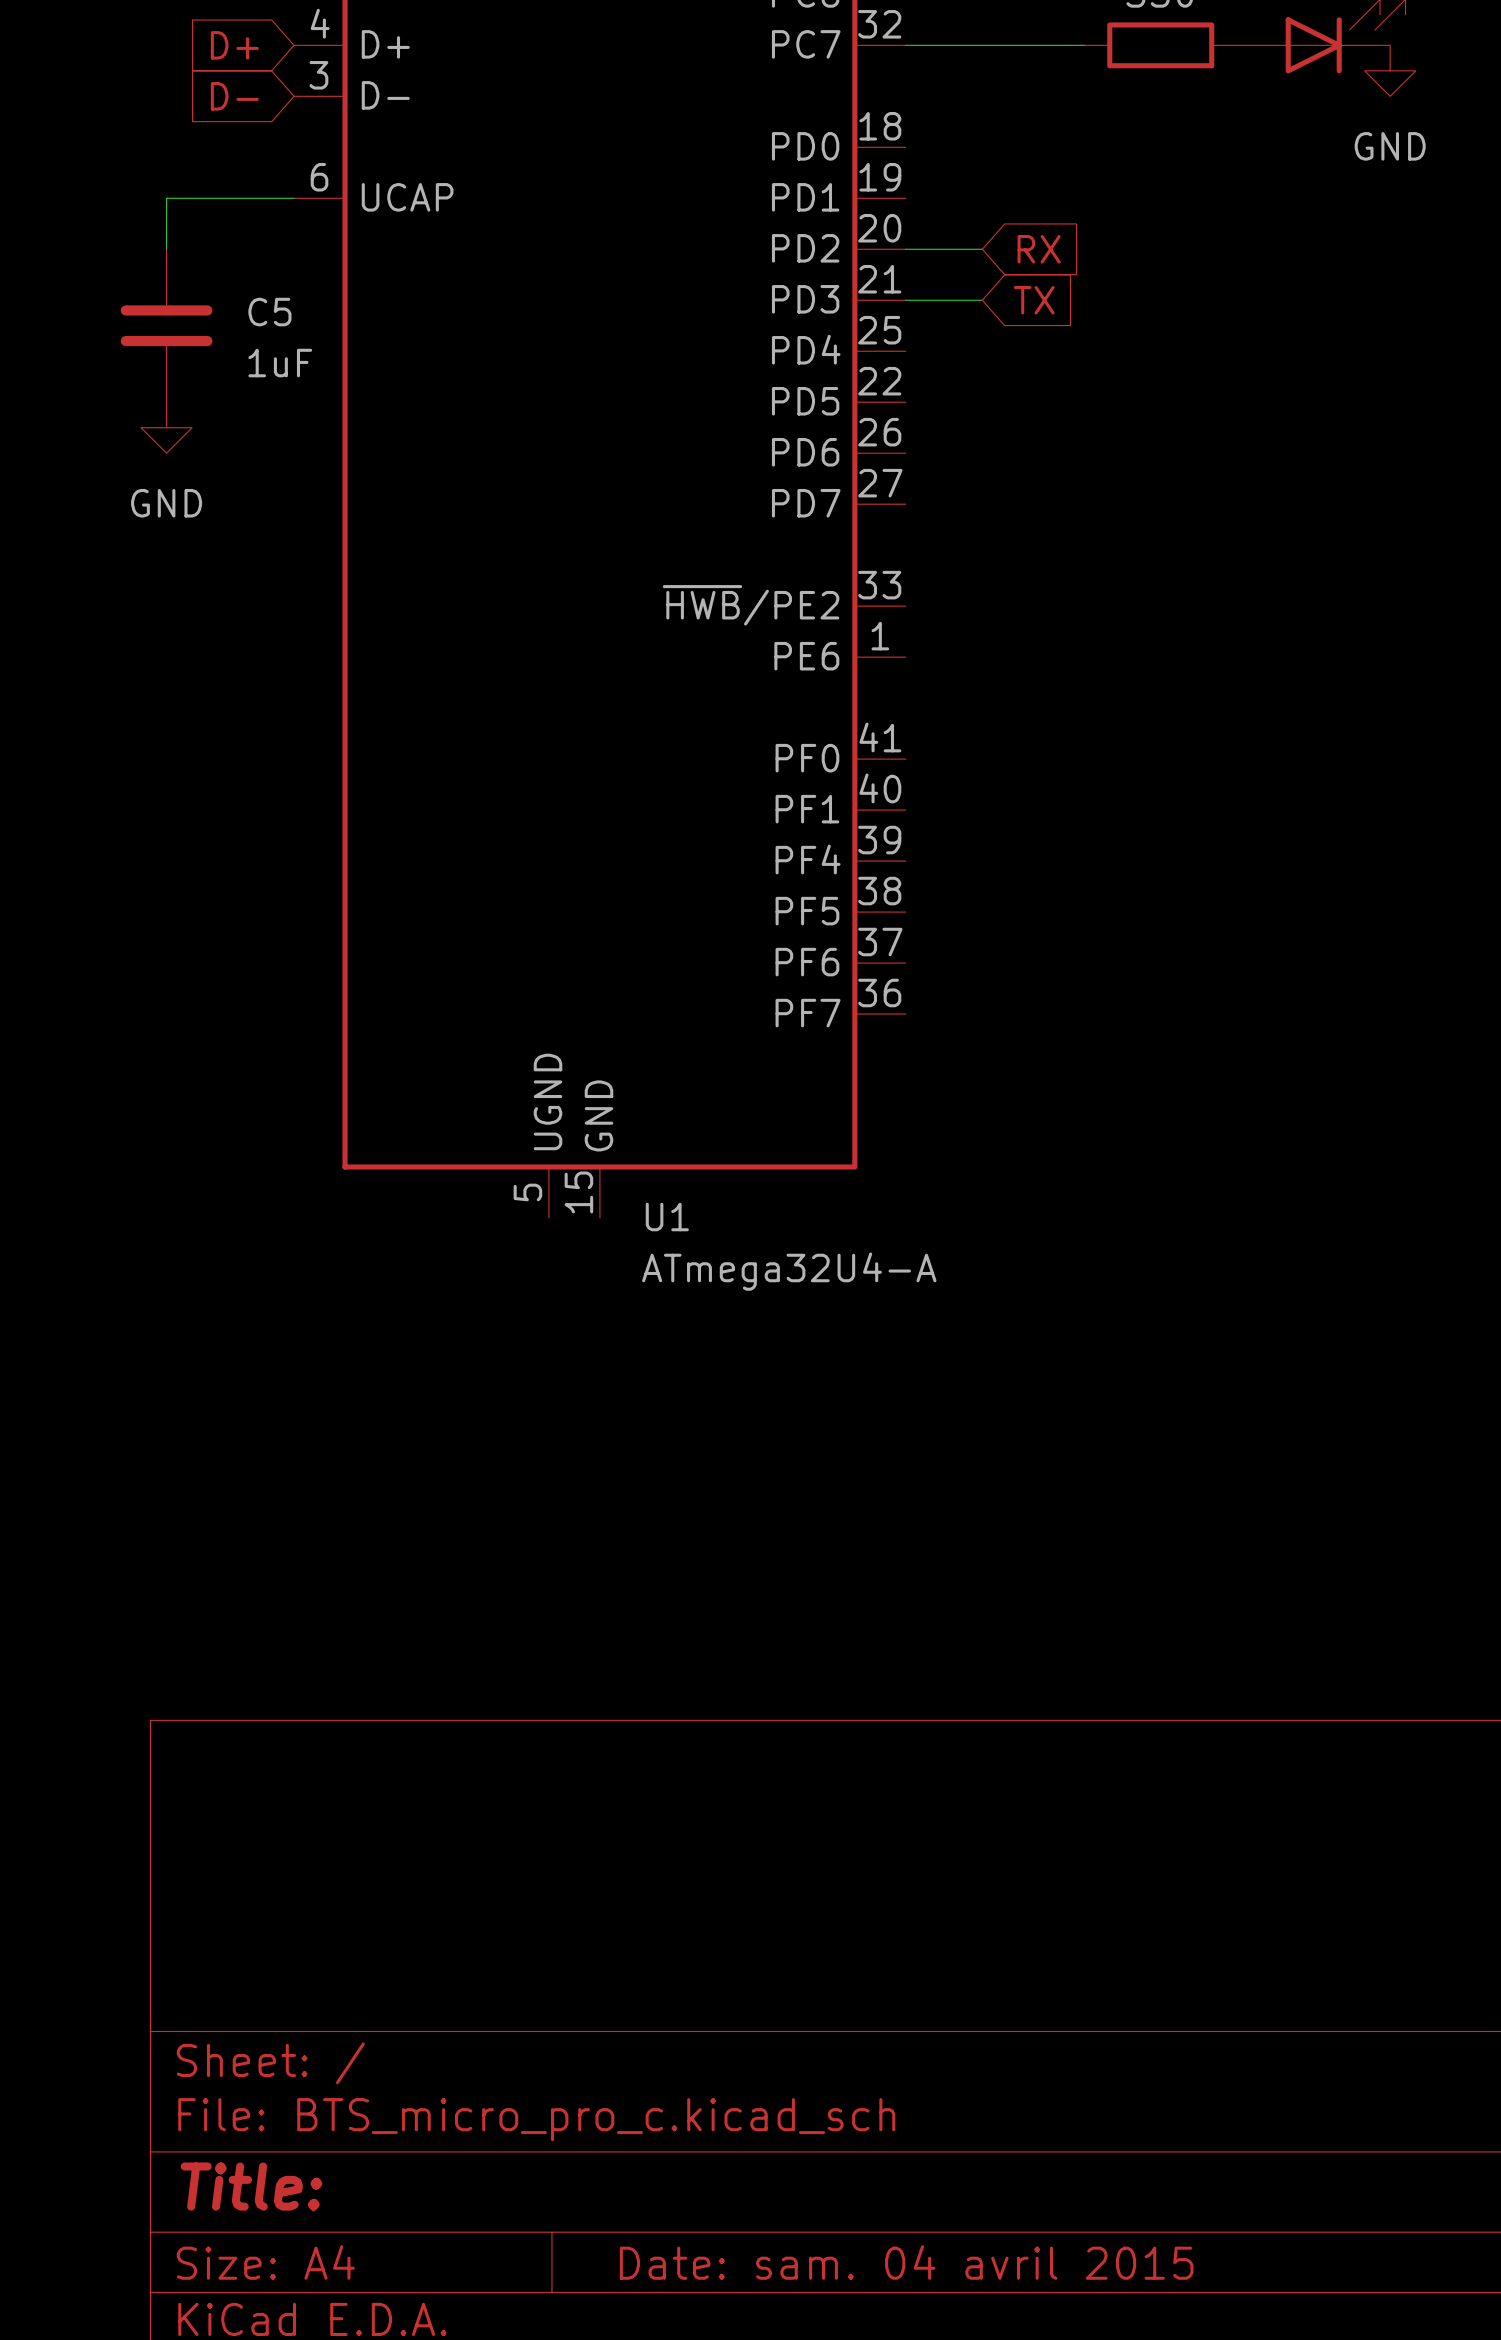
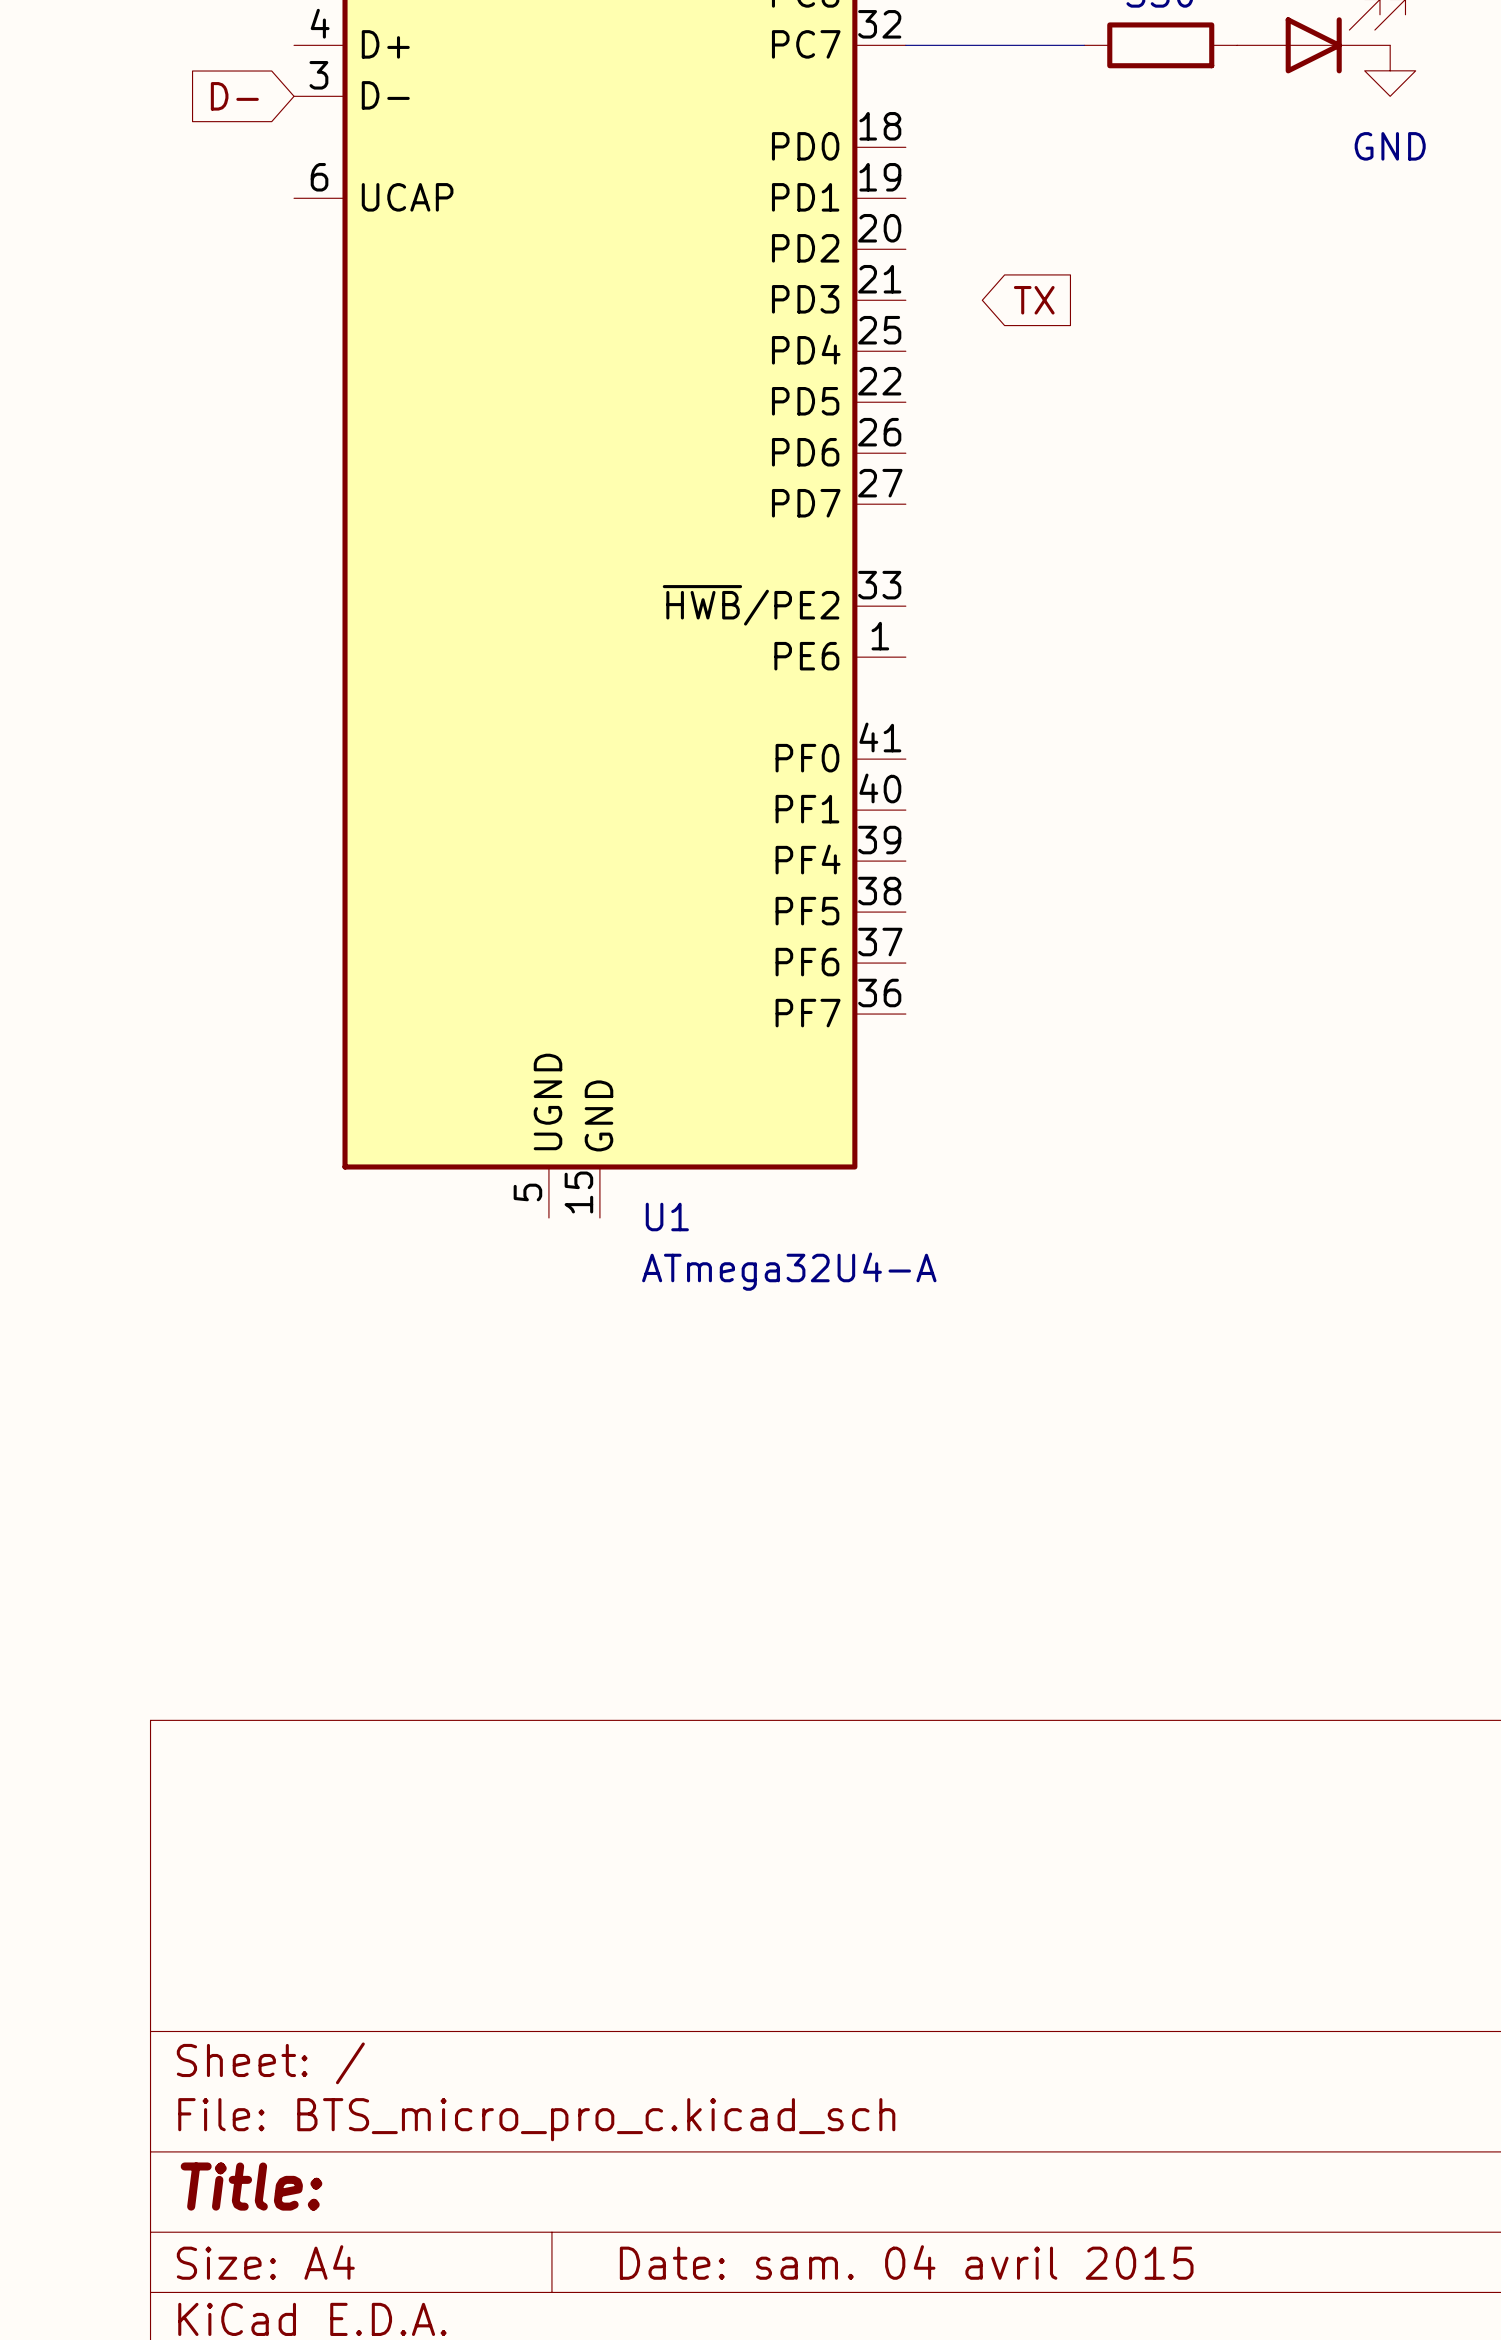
global label: D+ (234, 45) -> none
wire: (294, 198) (166, 198) (166, 249) -> none
wire: (905, 249) (982, 249) -> none
global label: RX (1039, 249) -> none
wire: (905, 300) (982, 300) -> none
C5: 1uF (166, 325) -> none
power symbol: GND (166, 427) -> none

